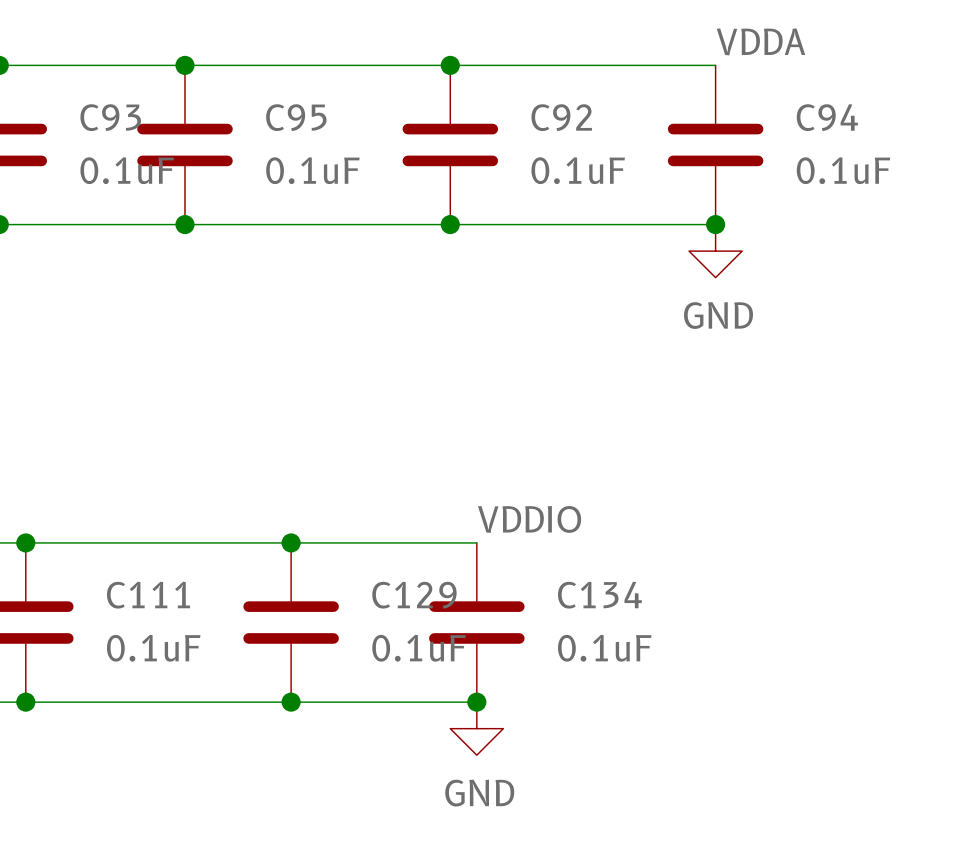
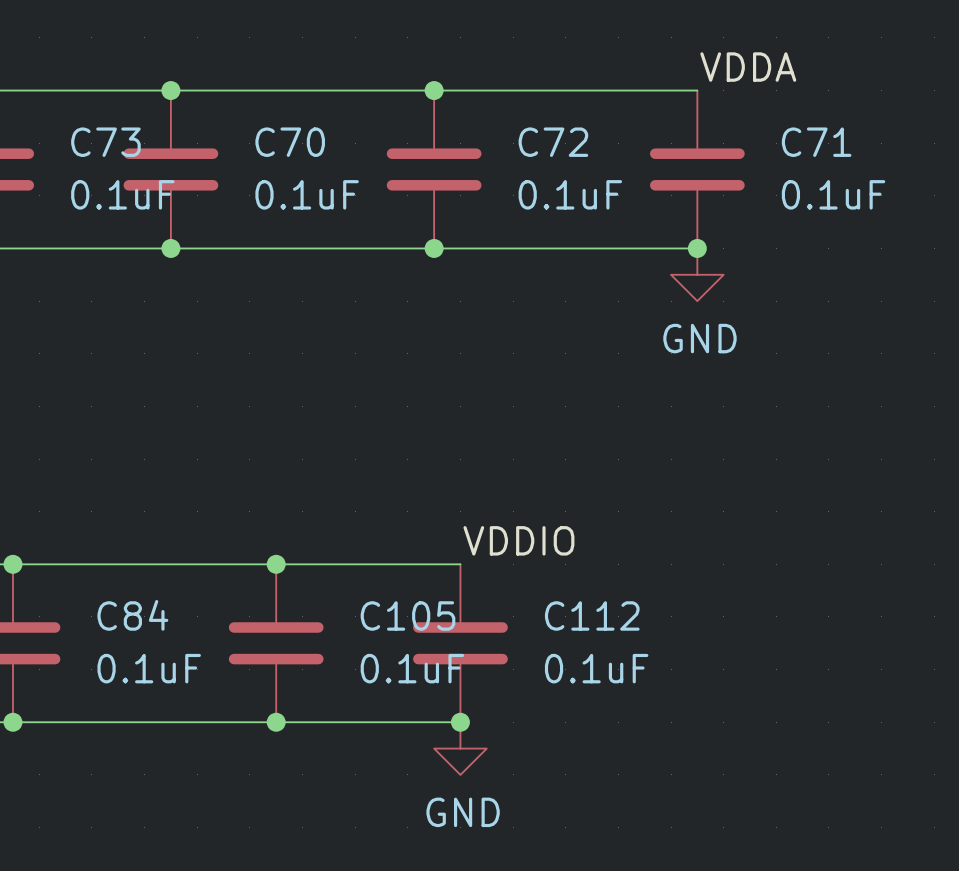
C93 name: C93 (110, 117) -> C73 (105, 142)
C95 name: C95 (296, 117) -> C70 (290, 142)
C92 name: C92 (561, 117) -> C72 (553, 142)
C94 name: C94 (827, 117) -> C71 (816, 142)
C111 name: C111 (148, 595) -> C84 (132, 615)
C129 name: C129 (414, 595) -> C105 (408, 615)
C134 name: C134 (599, 595) -> C112 (592, 615)

